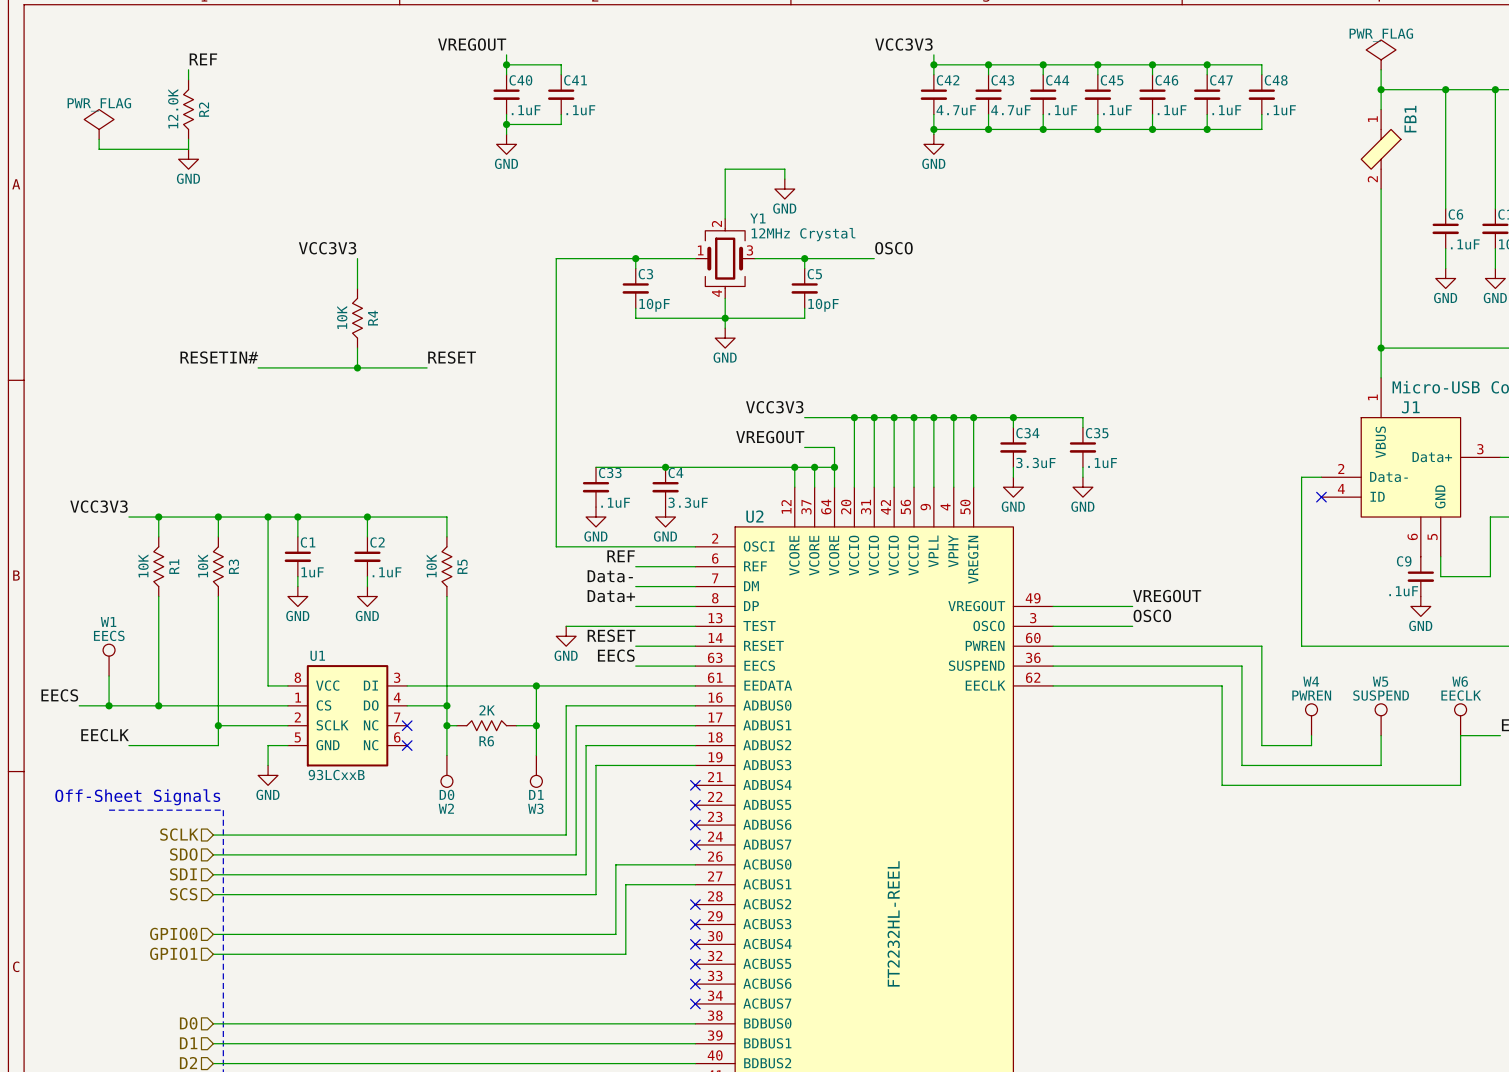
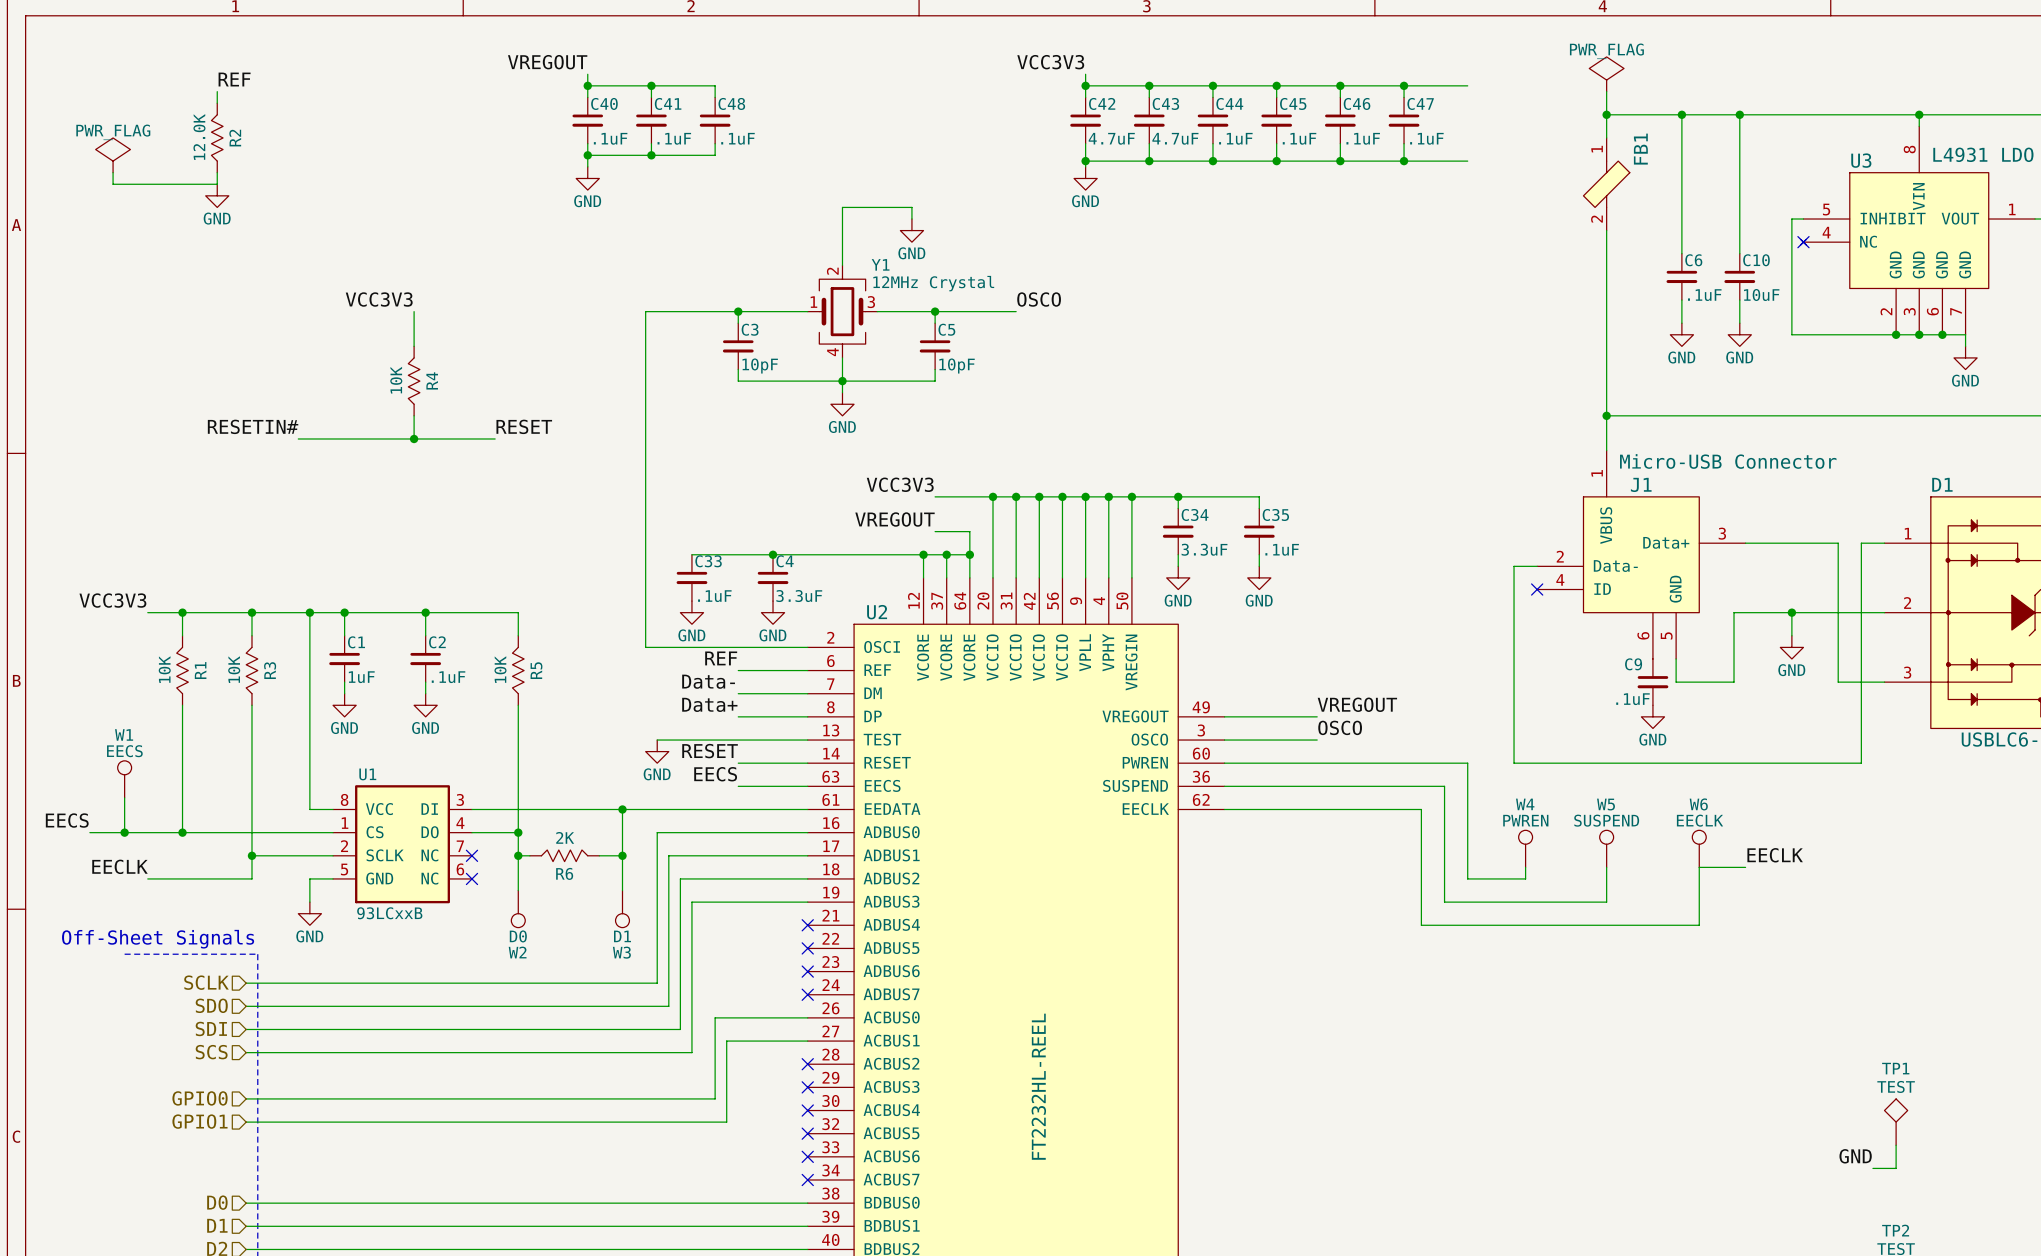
wire: none -> (651, 85) (715, 85) (715, 97)
junction: none -> (651, 85)
wire: (1261, 64) (1261, 74) -> none
C48 position: (1261, 94) -> (715, 120)
wire: none -> (715, 143) (715, 155) (651, 155)
wire: (1261, 114) (1261, 129) -> none
junction: none -> (651, 155)

